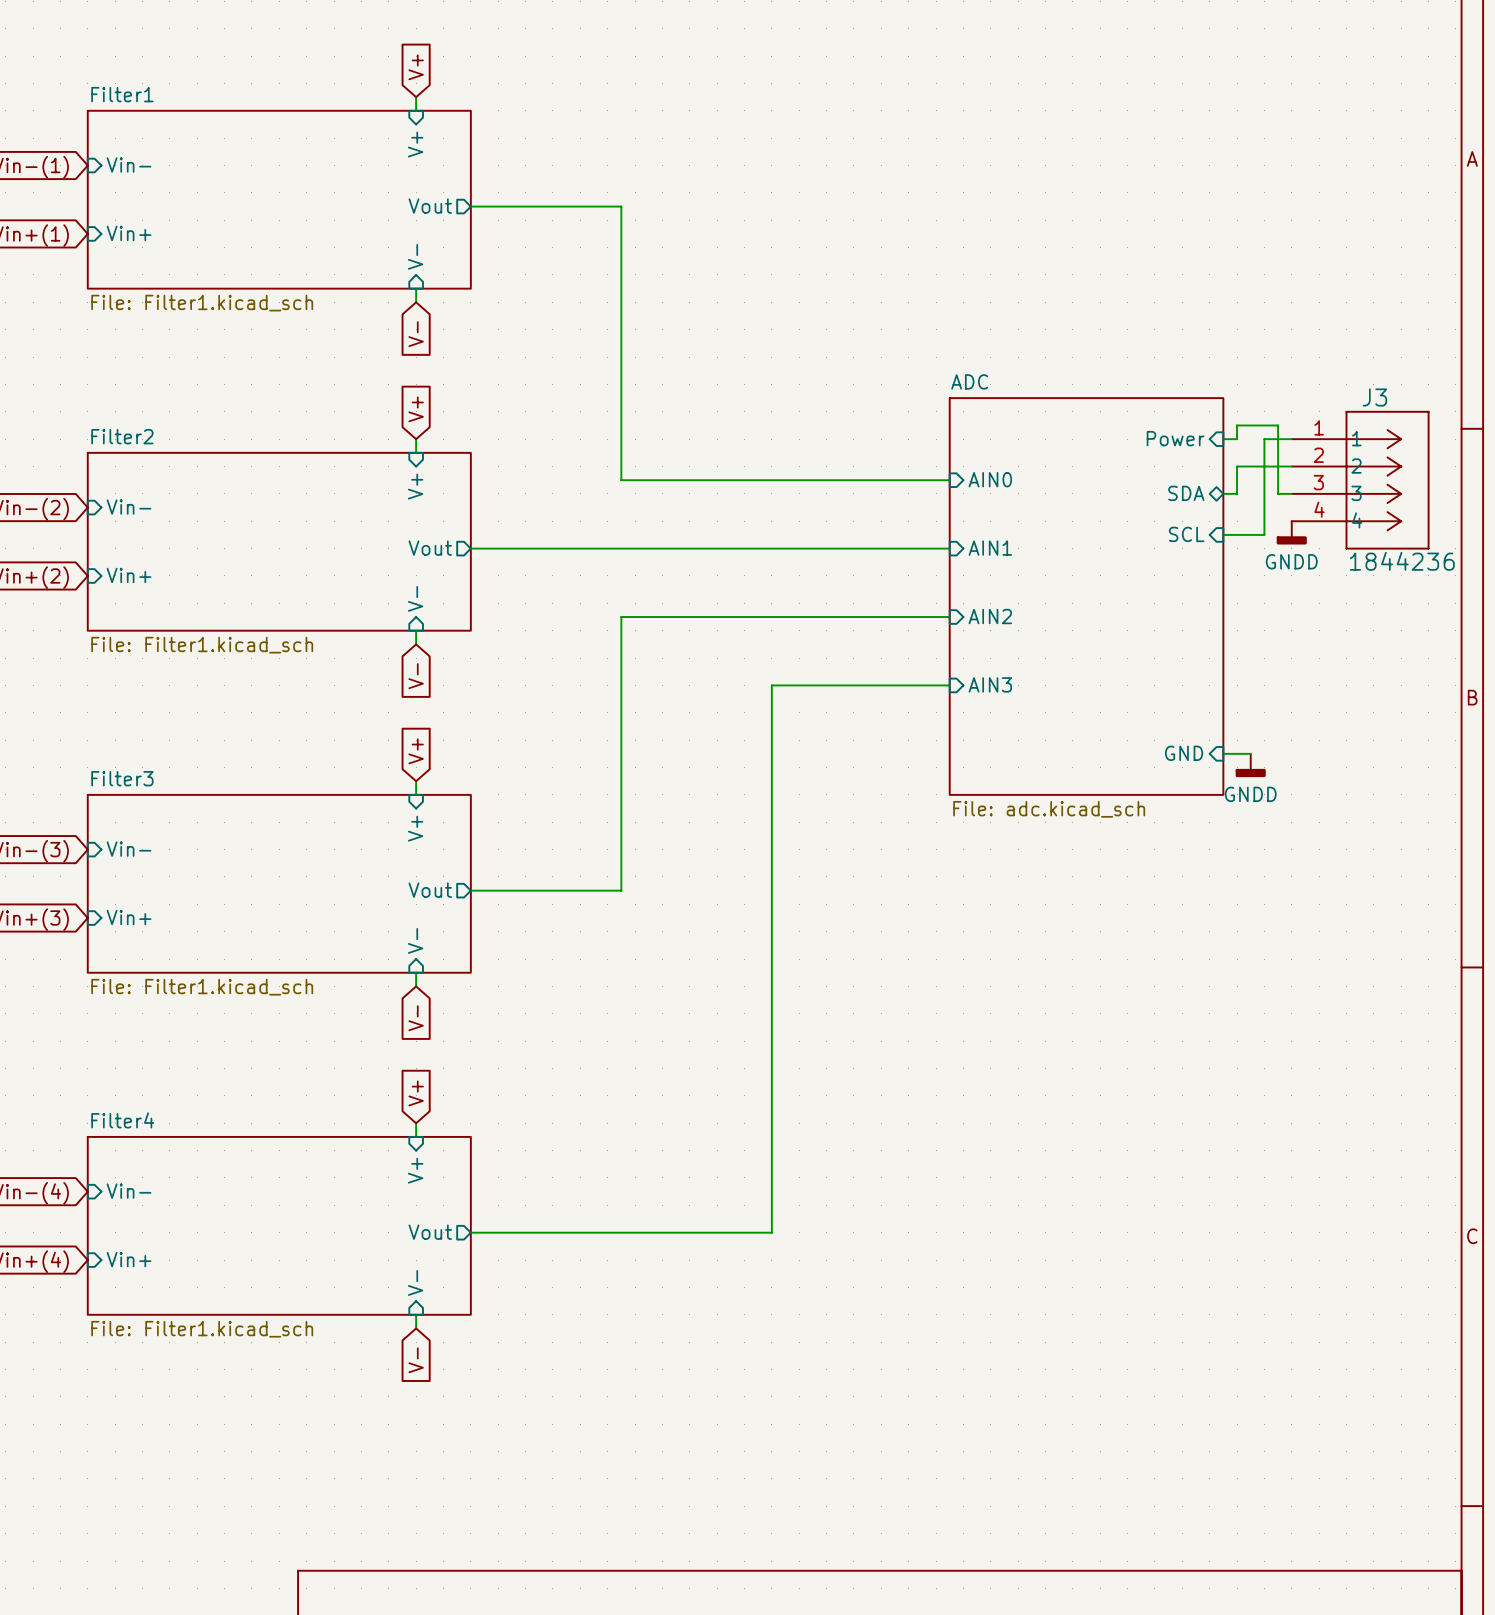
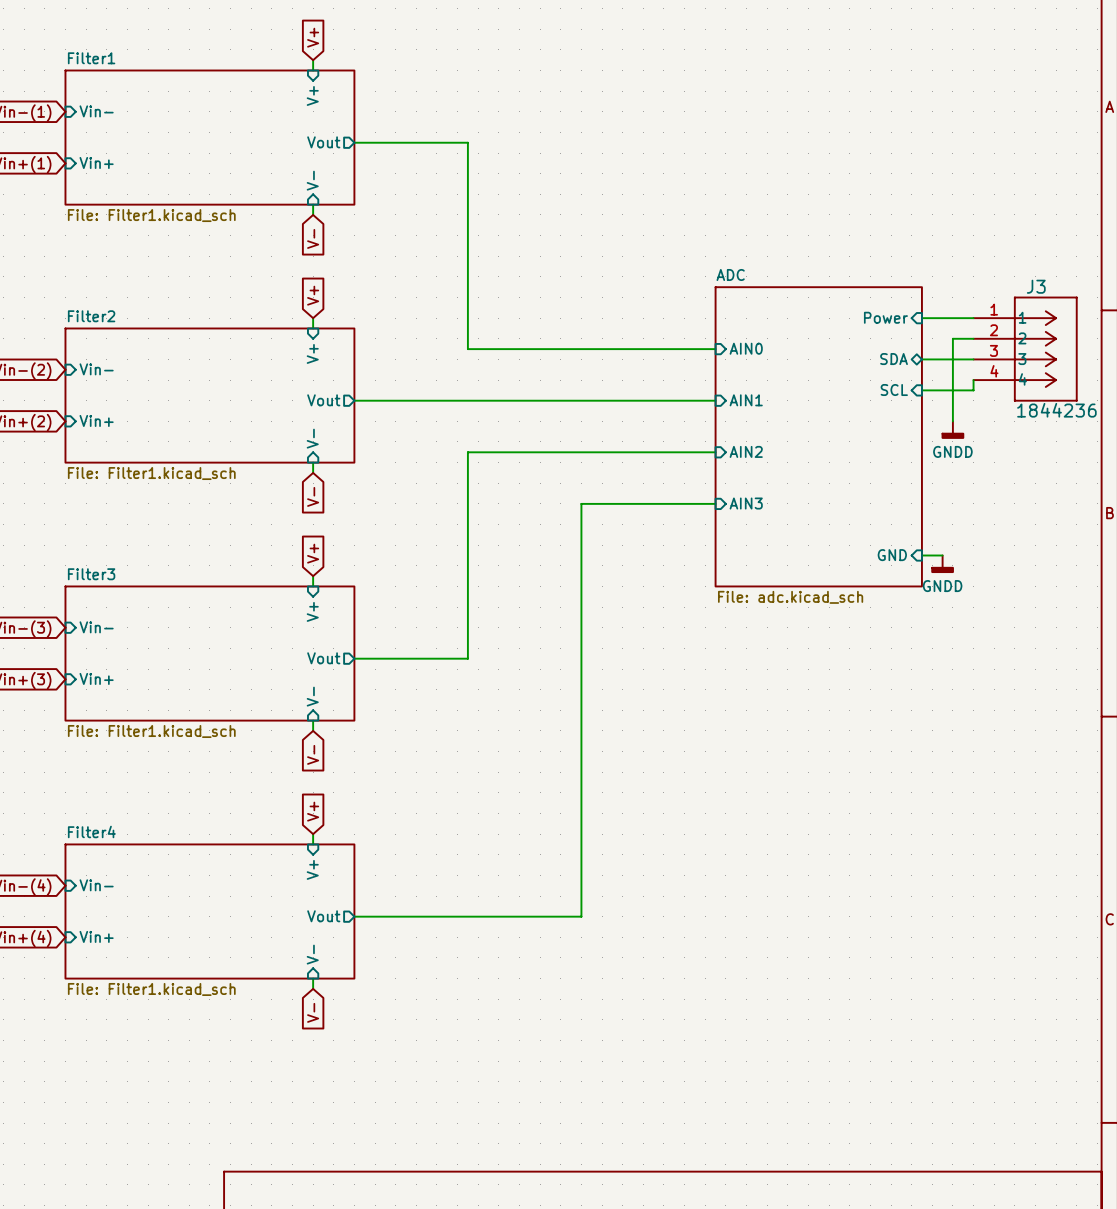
wire: (1237, 439) (1237, 425) (1278, 425) (1278, 493) -> (932, 359) (963, 359)
wire: (1264, 439) (1264, 466) (1237, 466) (1237, 493) -> (952, 318) (932, 318)
wire: none -> (973, 380) (973, 390) (952, 390) (952, 421)
power symbol position: GNDD (1291, 532) -> GNDD (952, 430)

